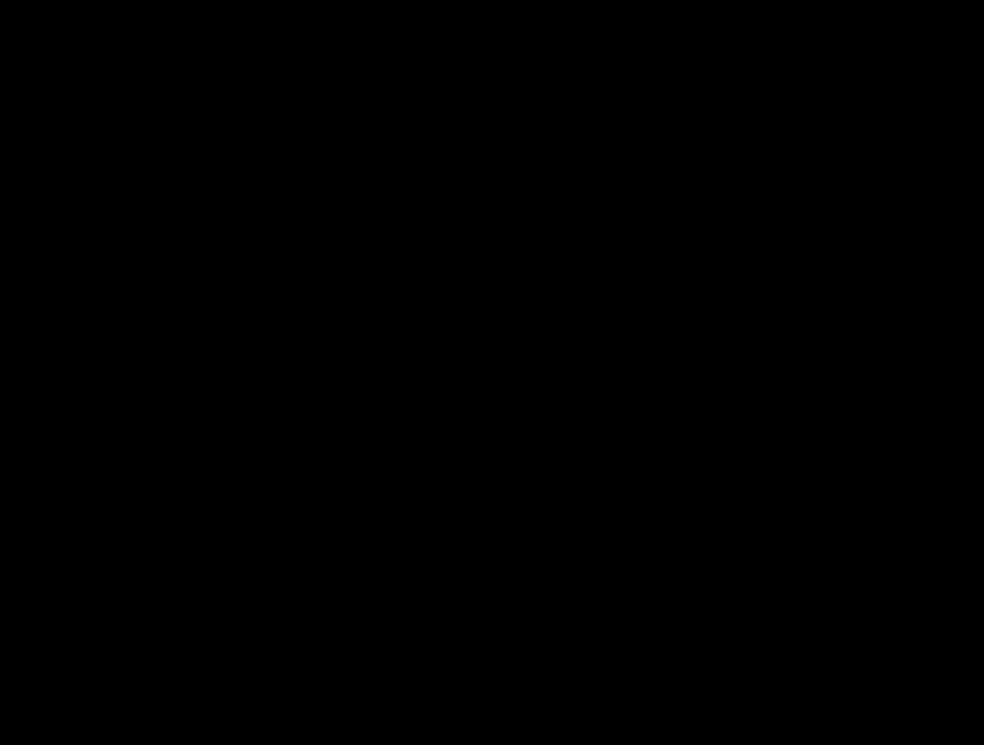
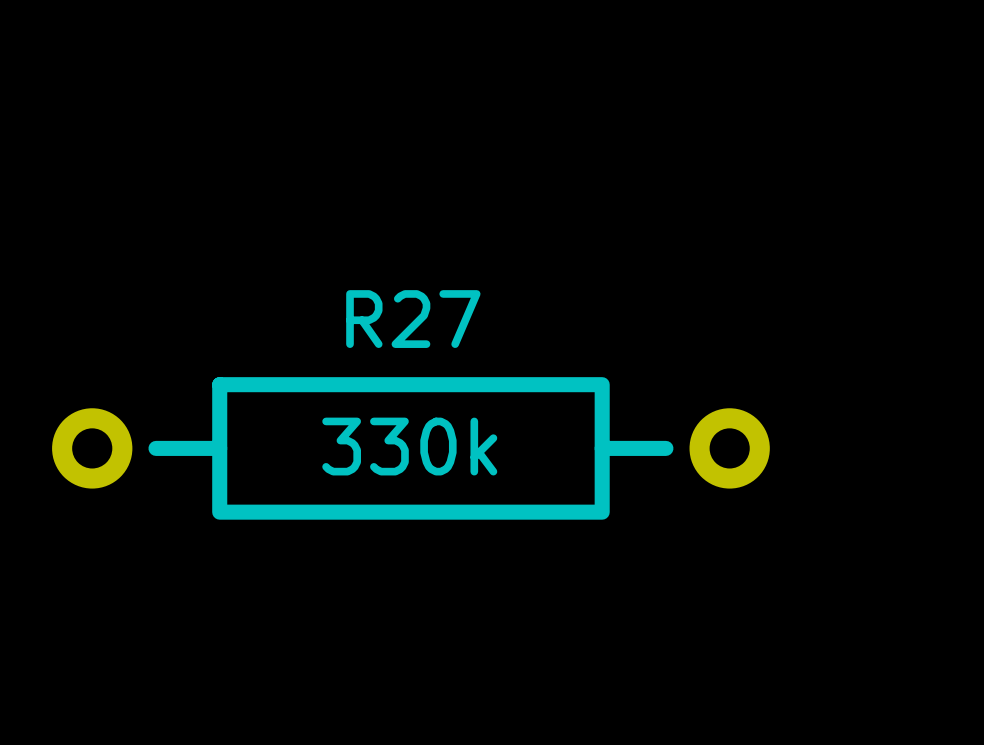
R27: none -> 330k (410, 448)

